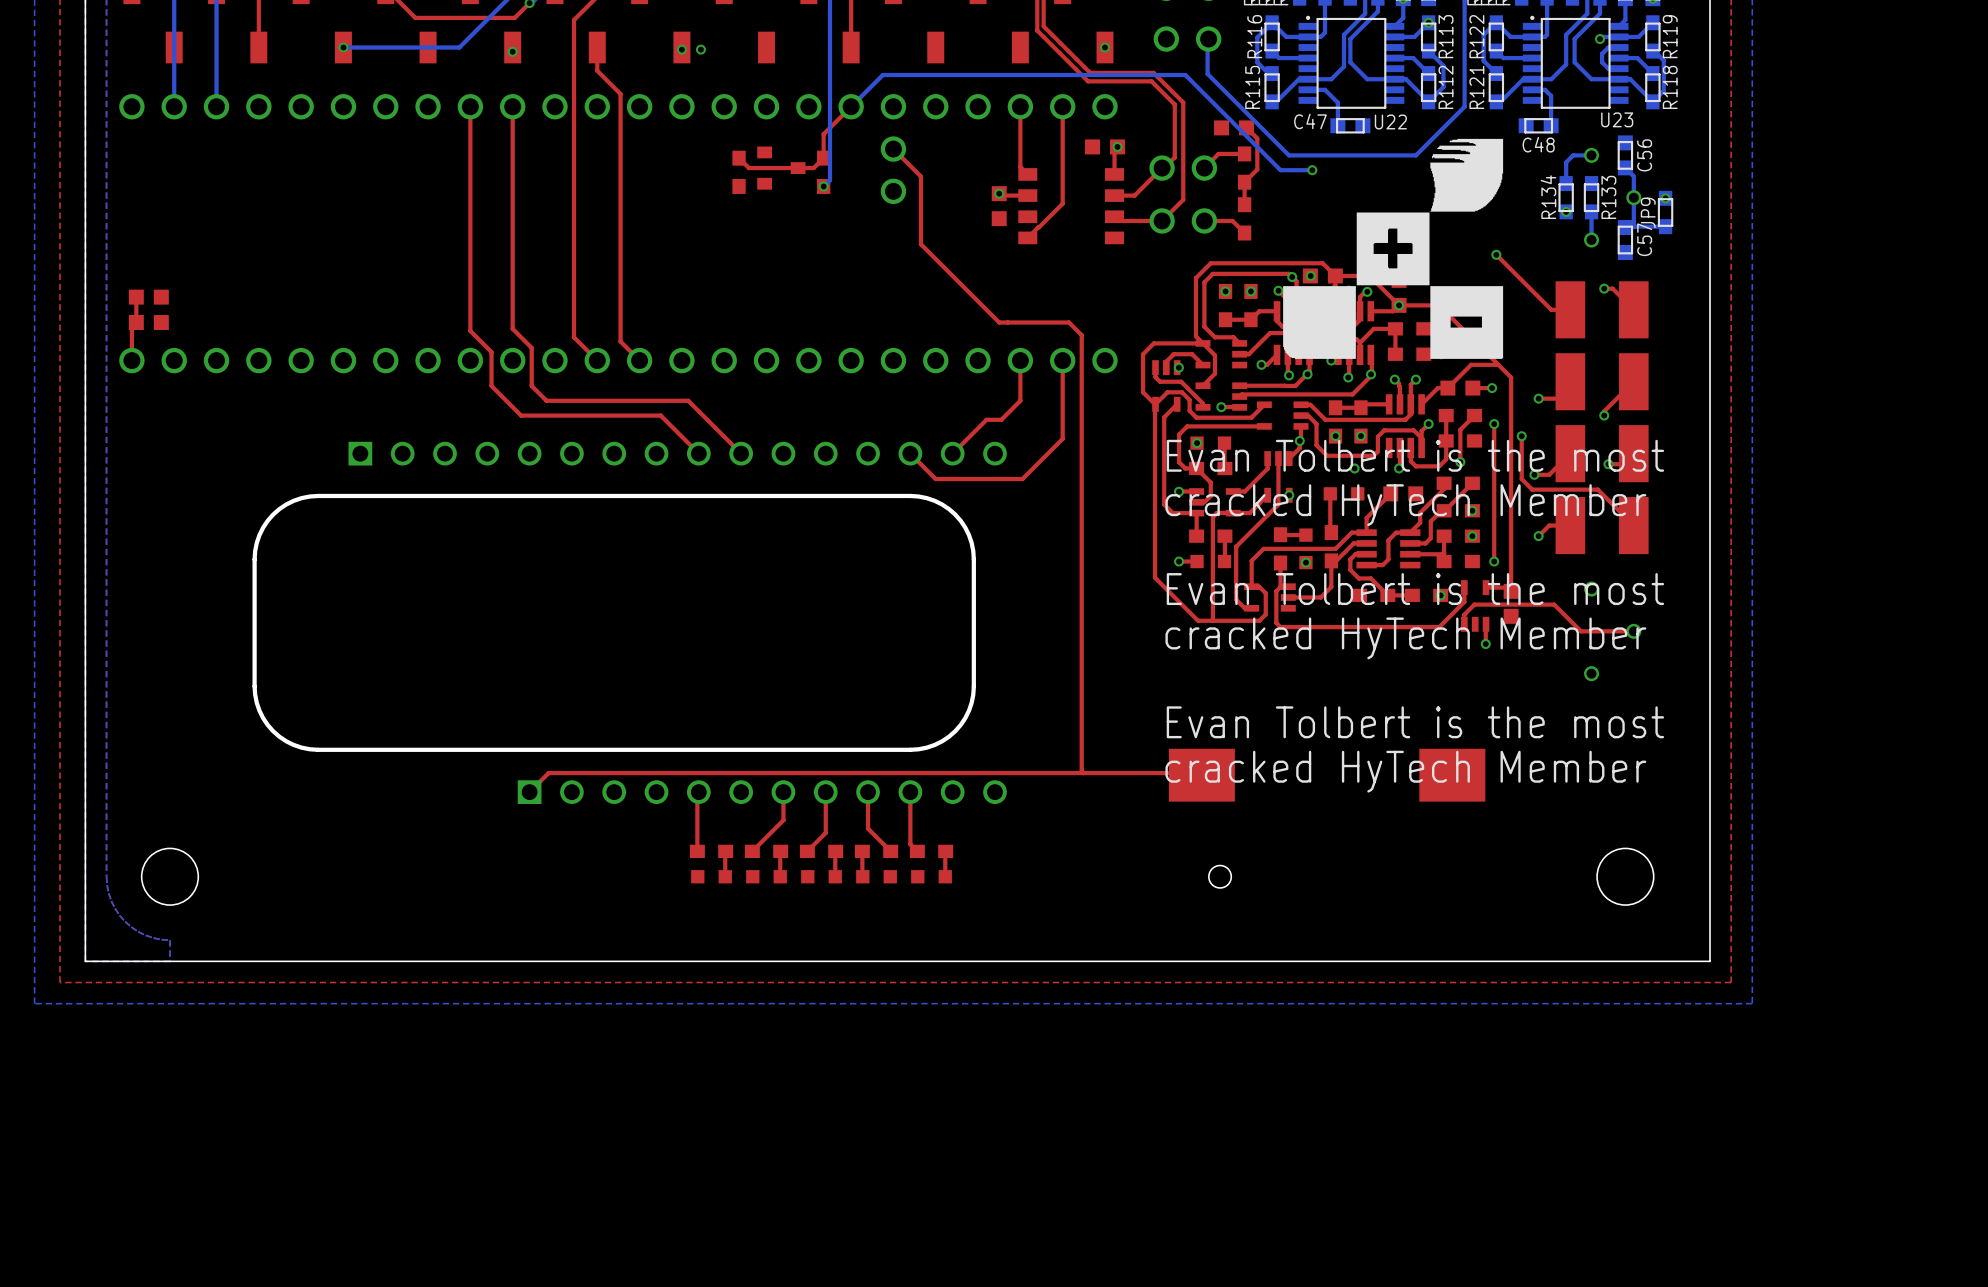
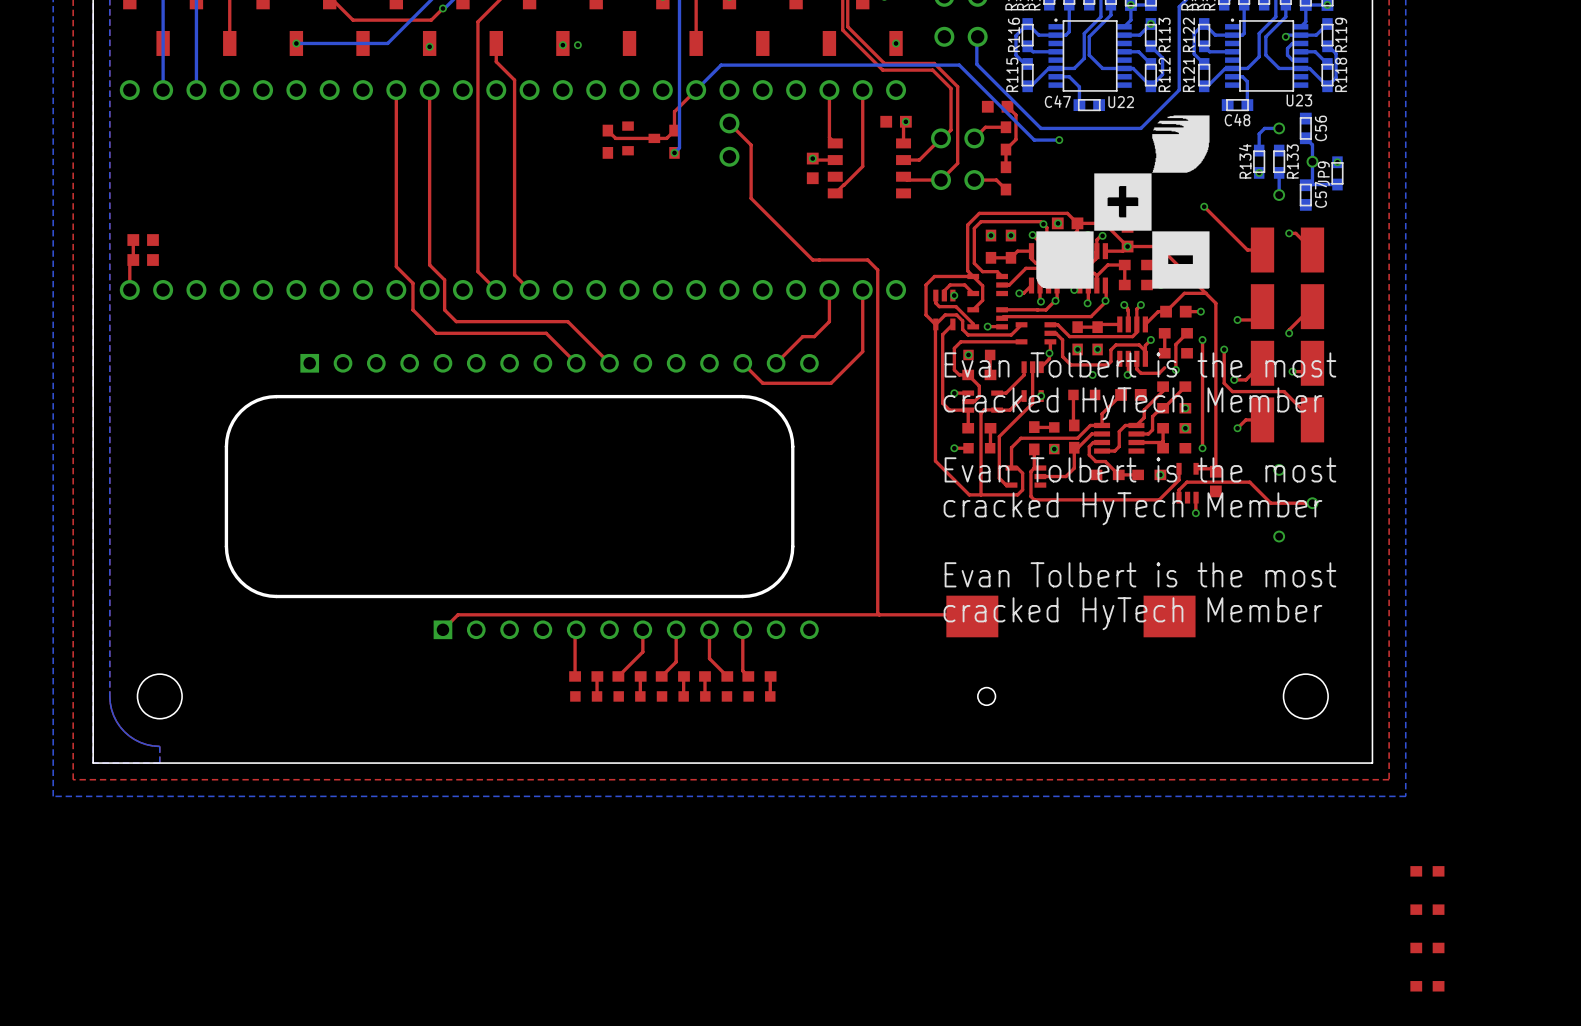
top track: (1446, 440) (1446, 459) -> none
part: none -> (1427, 871)
part: none -> (1427, 909)
part: none -> (1427, 947)
part: none -> (1427, 986)

